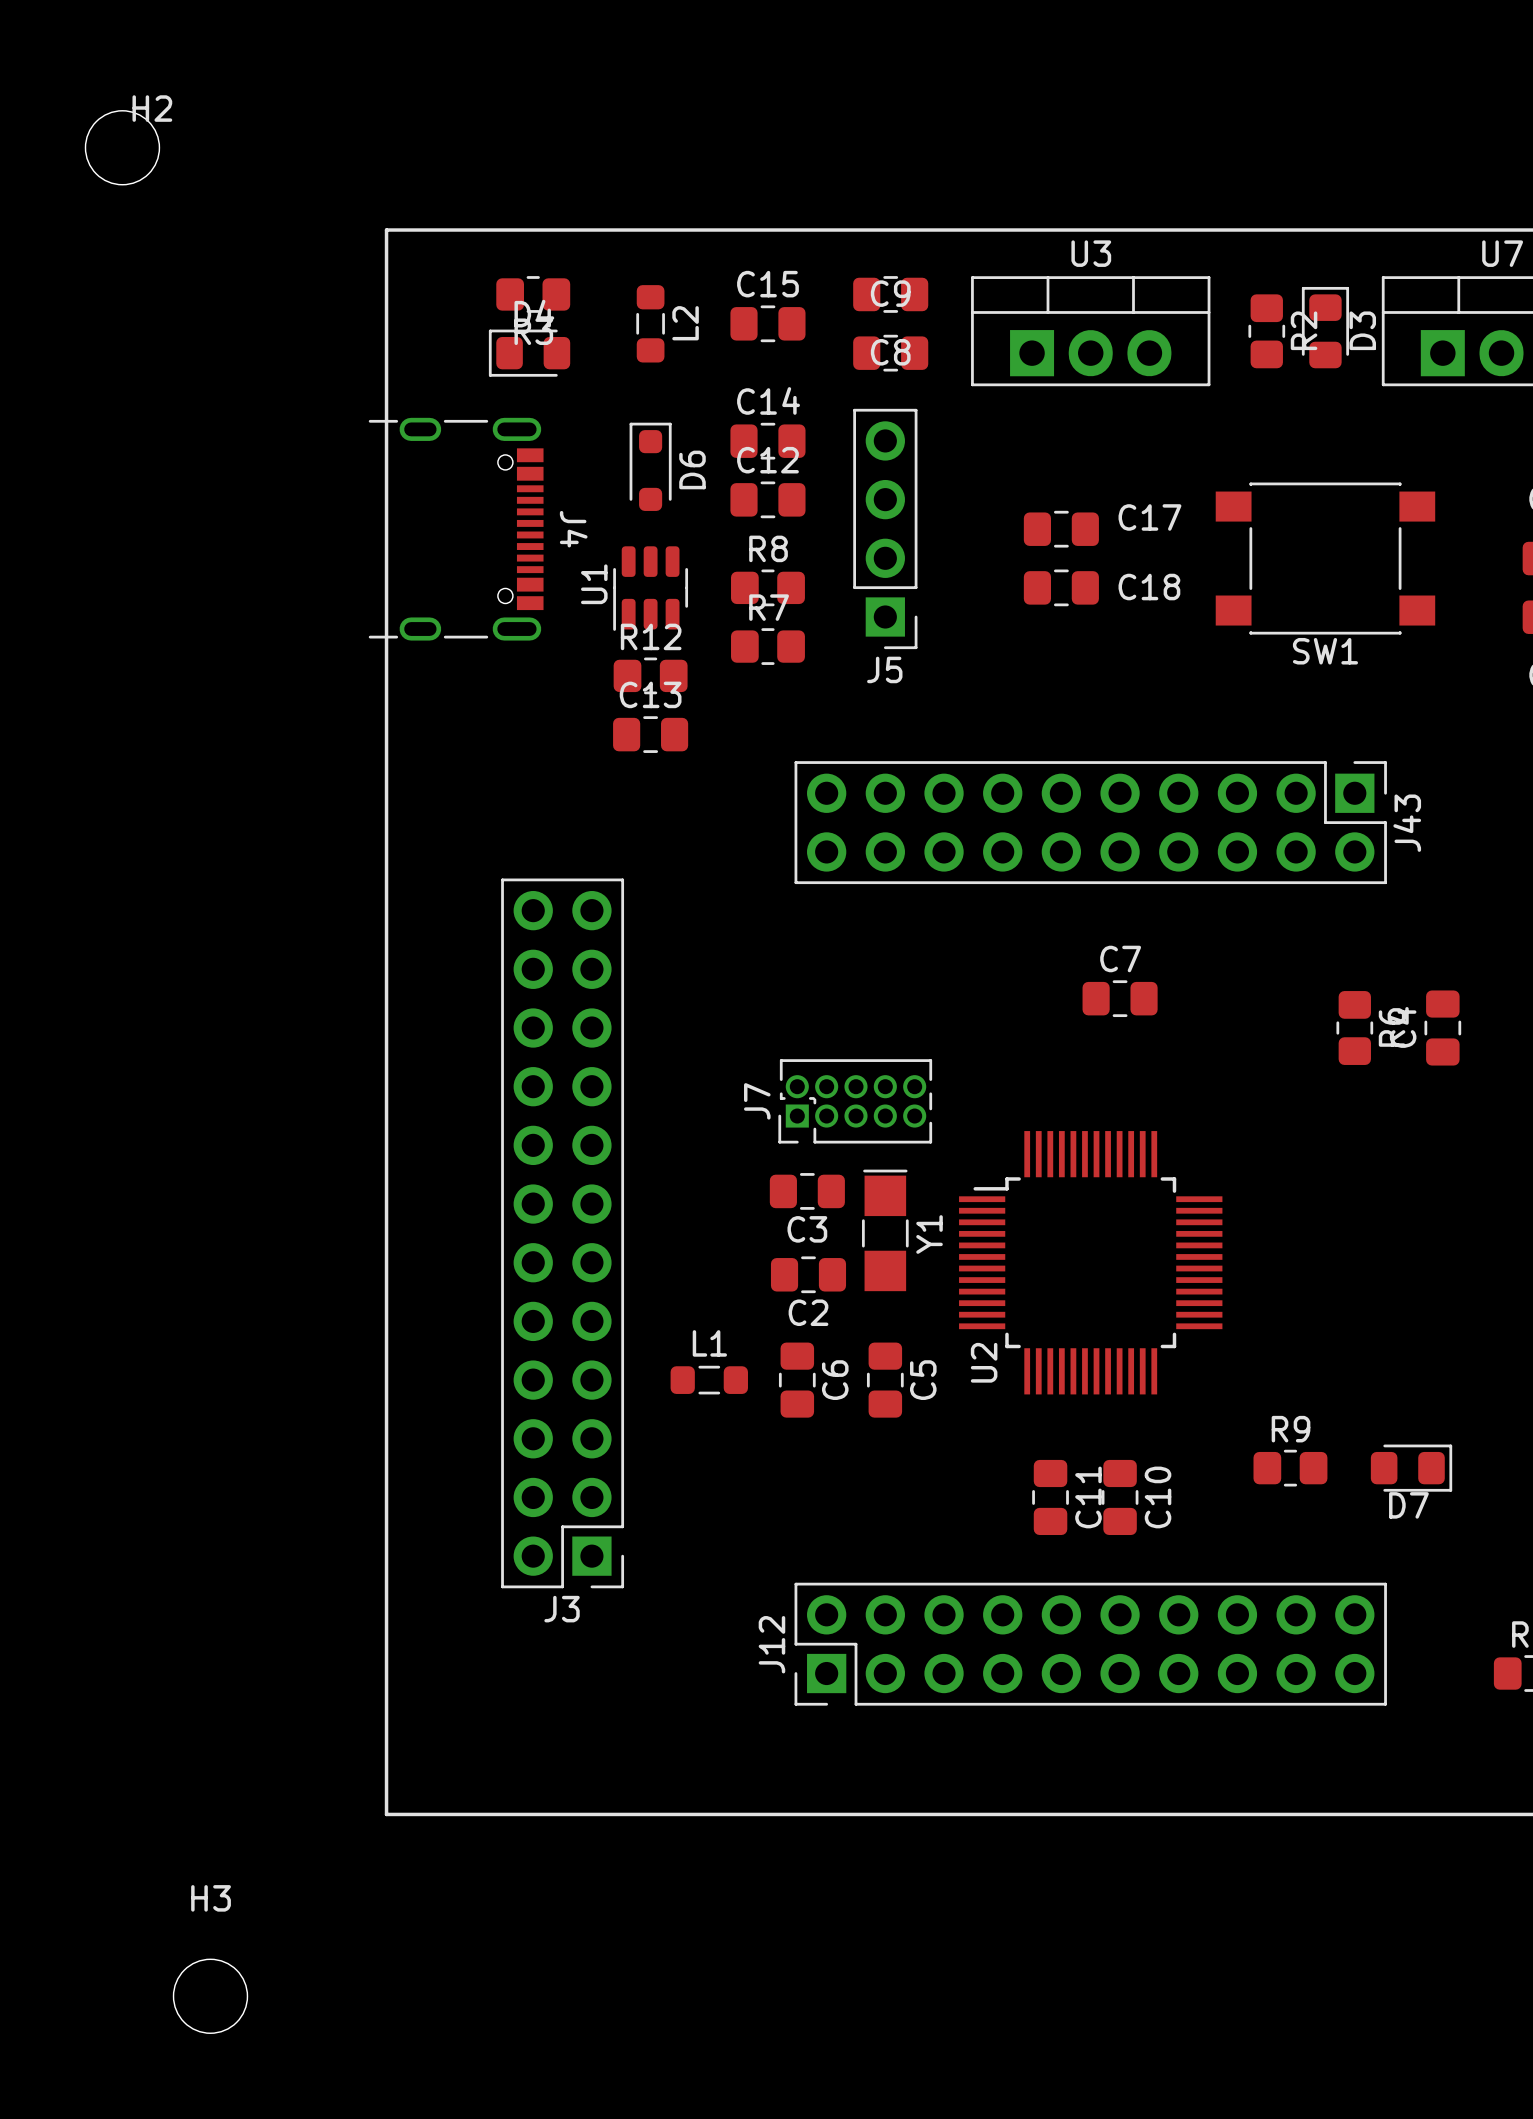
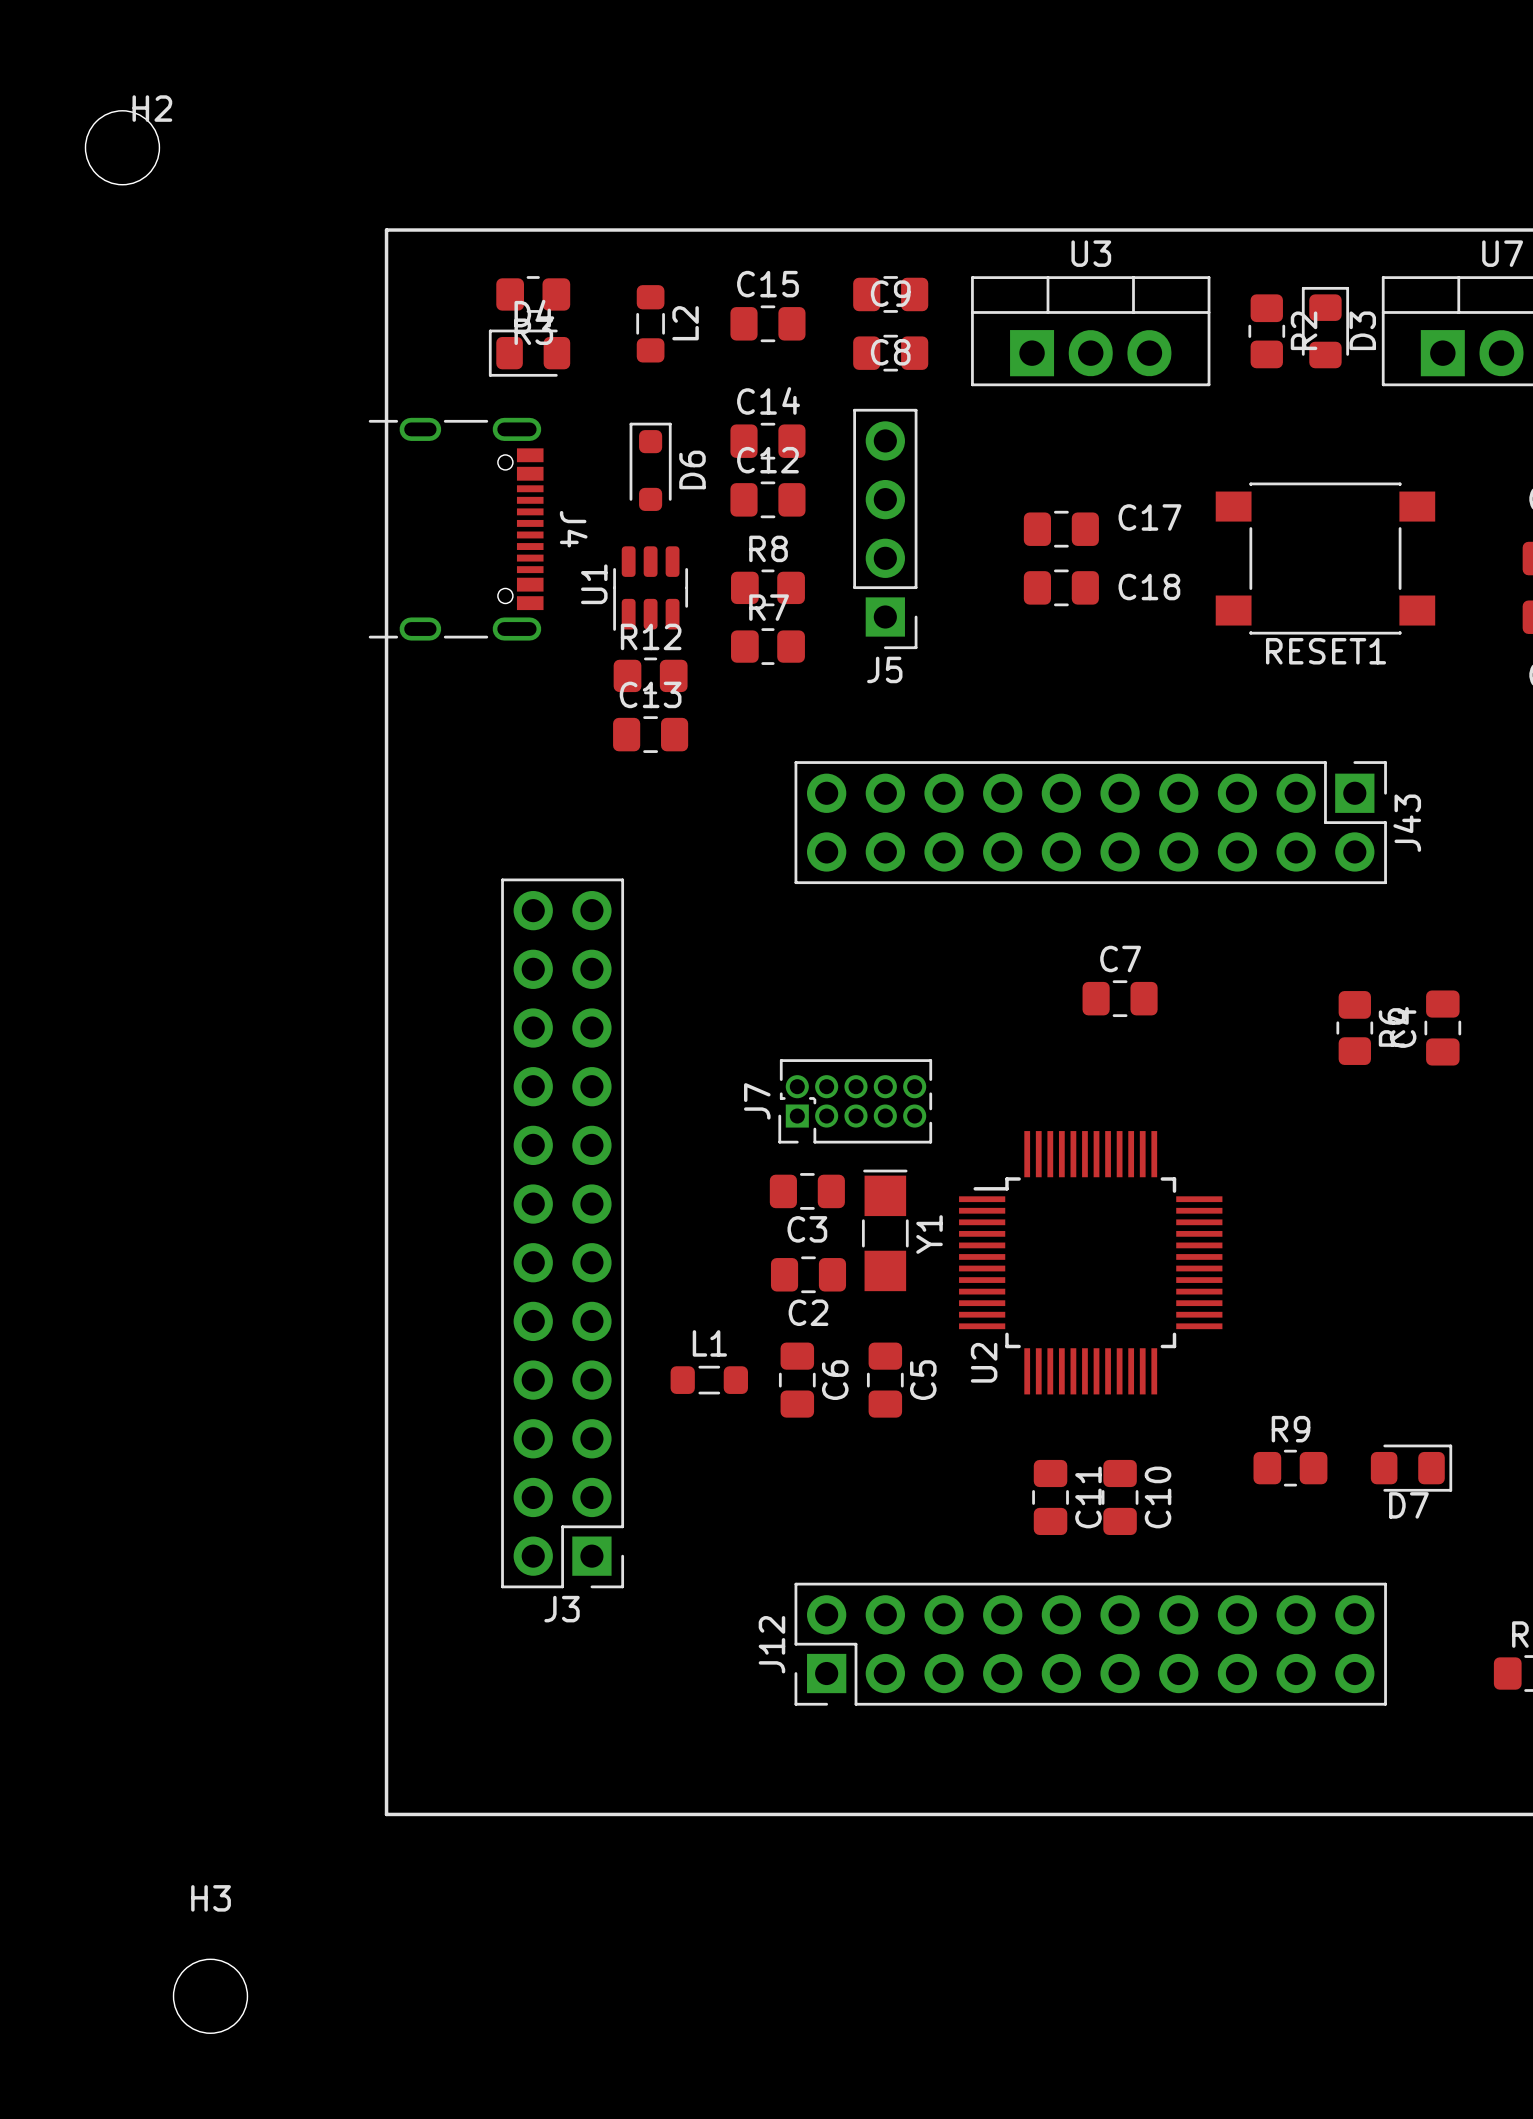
SW1 name: SW1 (1325, 651) -> RESET1 (1326, 651)

